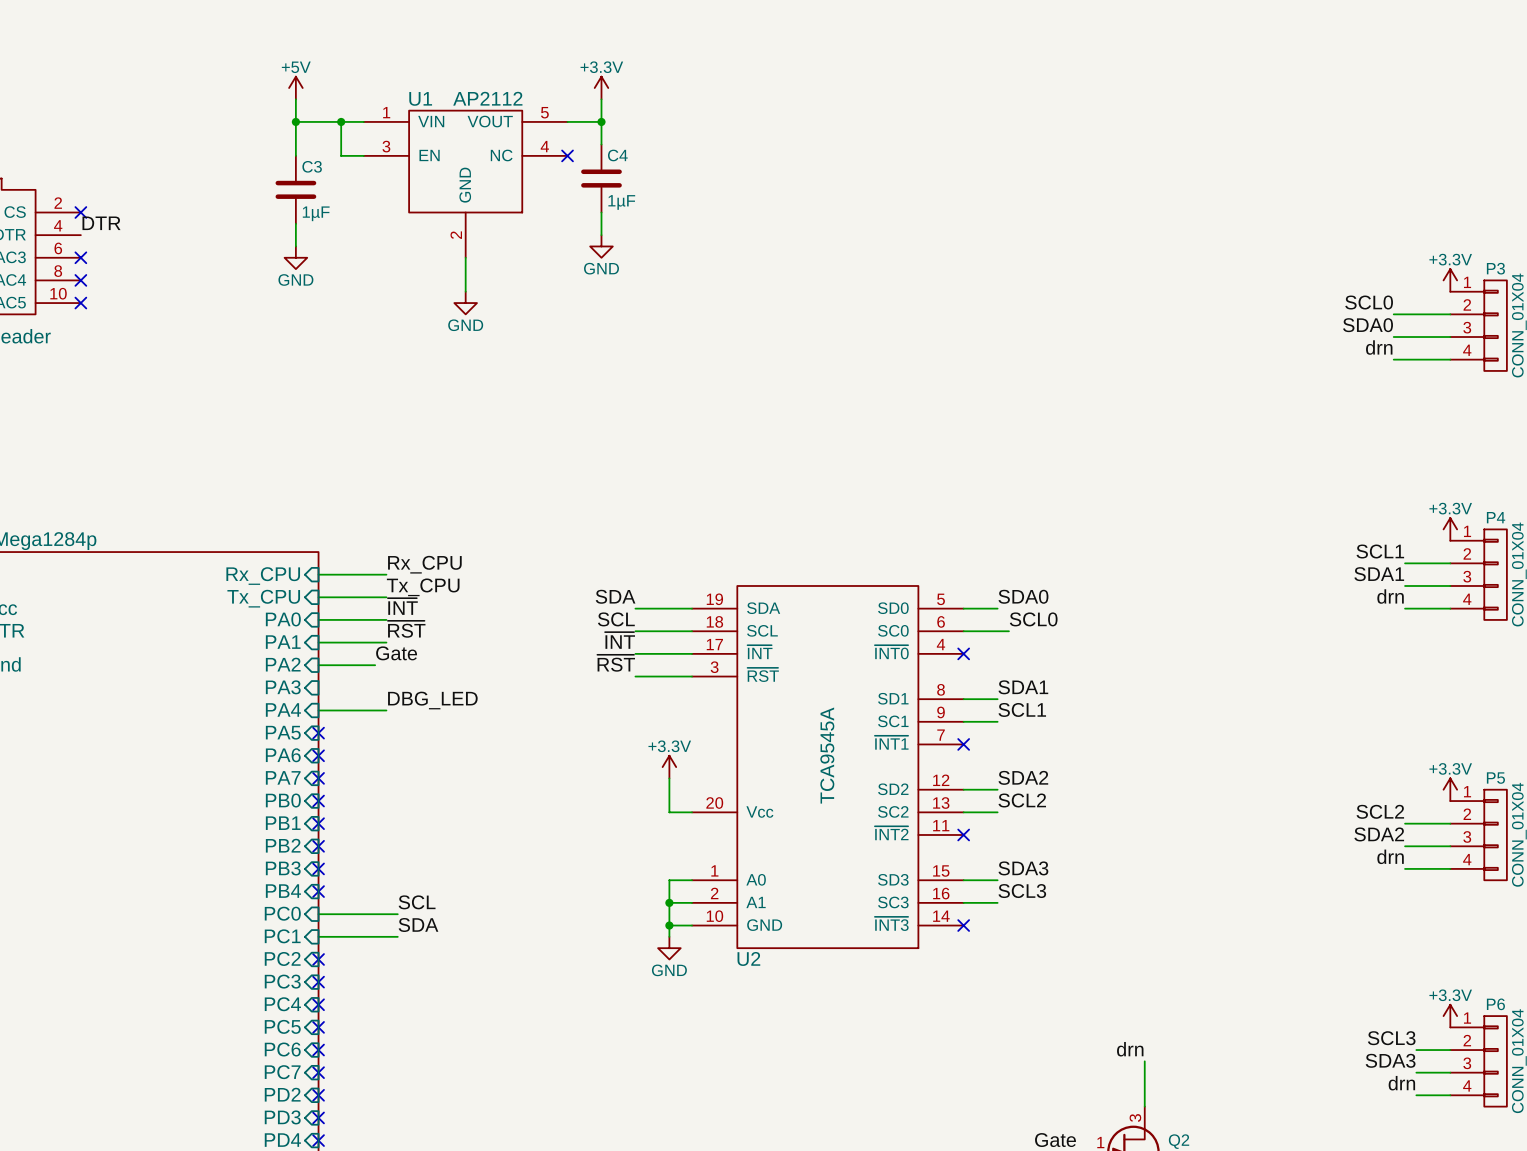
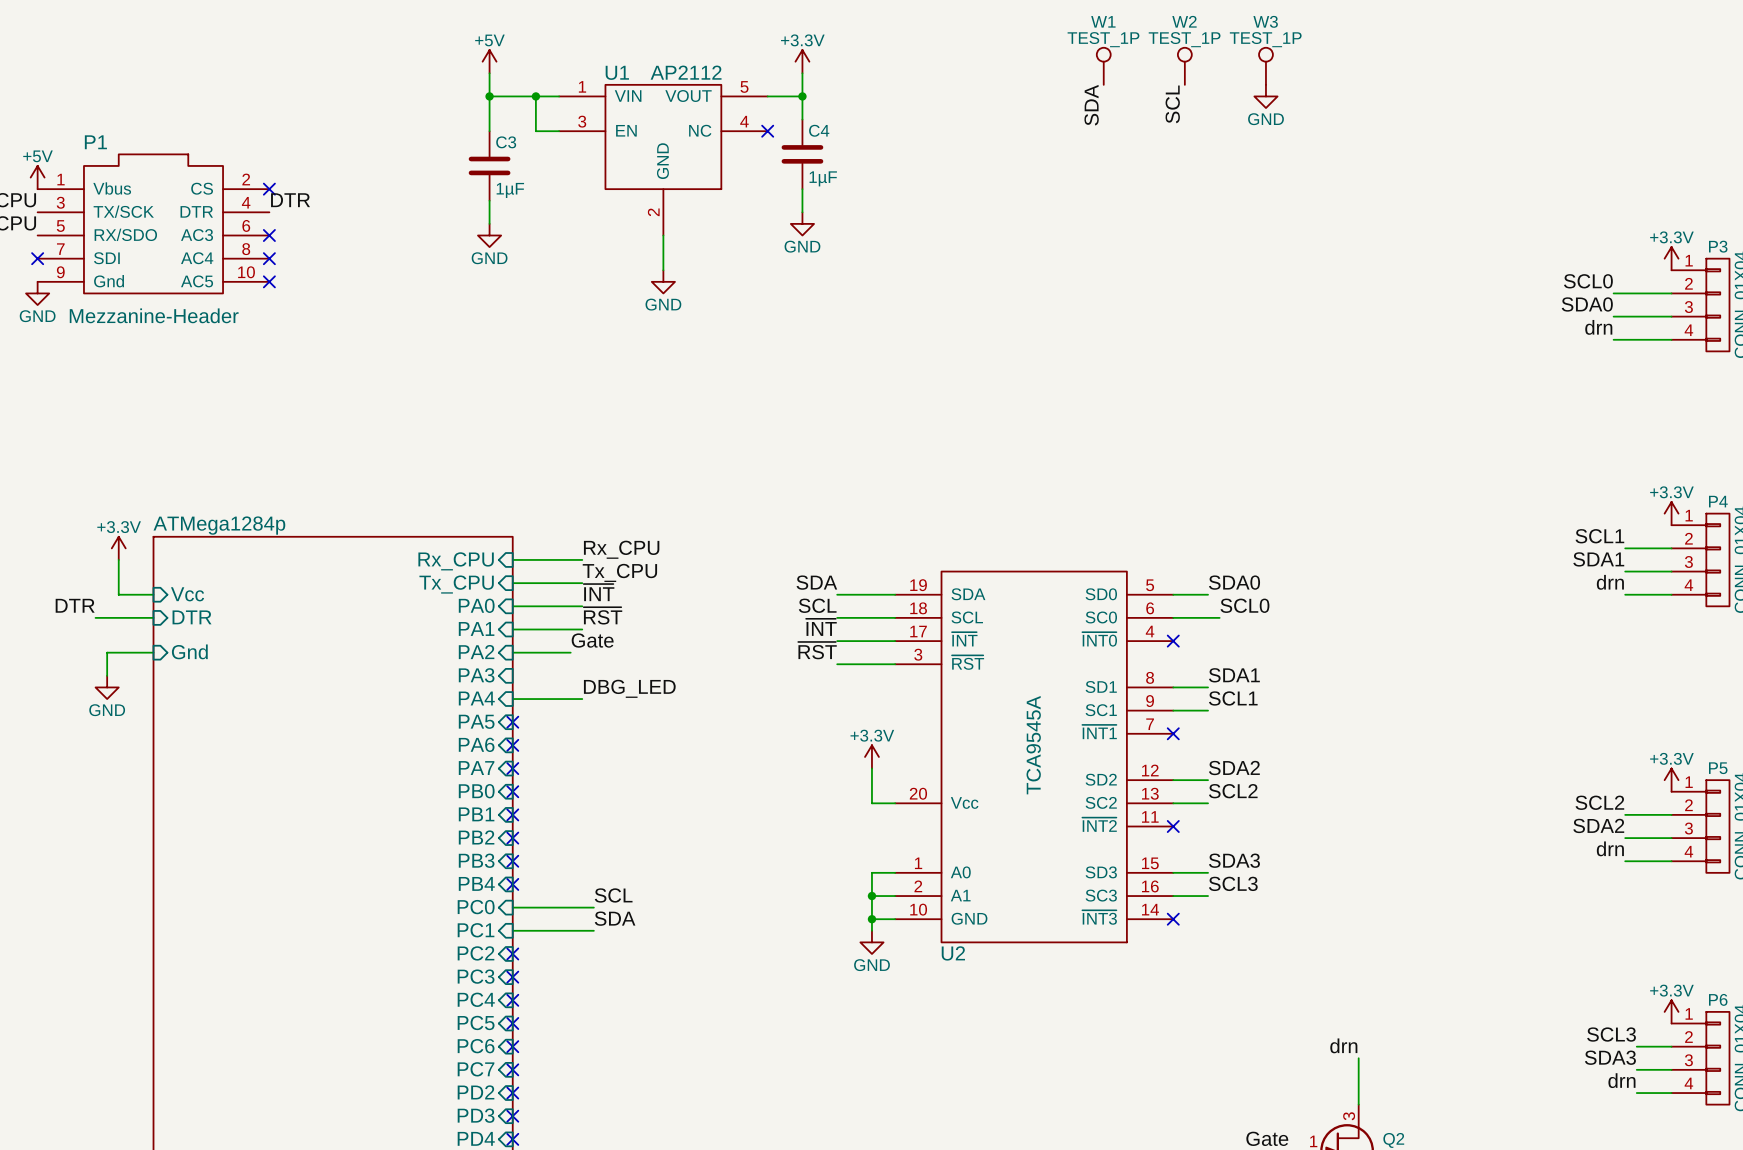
W1: none -> TEST_1P (1103, 66)
W2: none -> TEST_1P (1184, 66)
W3: none -> TEST_1P (1265, 66)
power symbol: none -> GND (1265, 96)
label: none -> SCL (1172, 104)
label: none -> SDA (1091, 105)

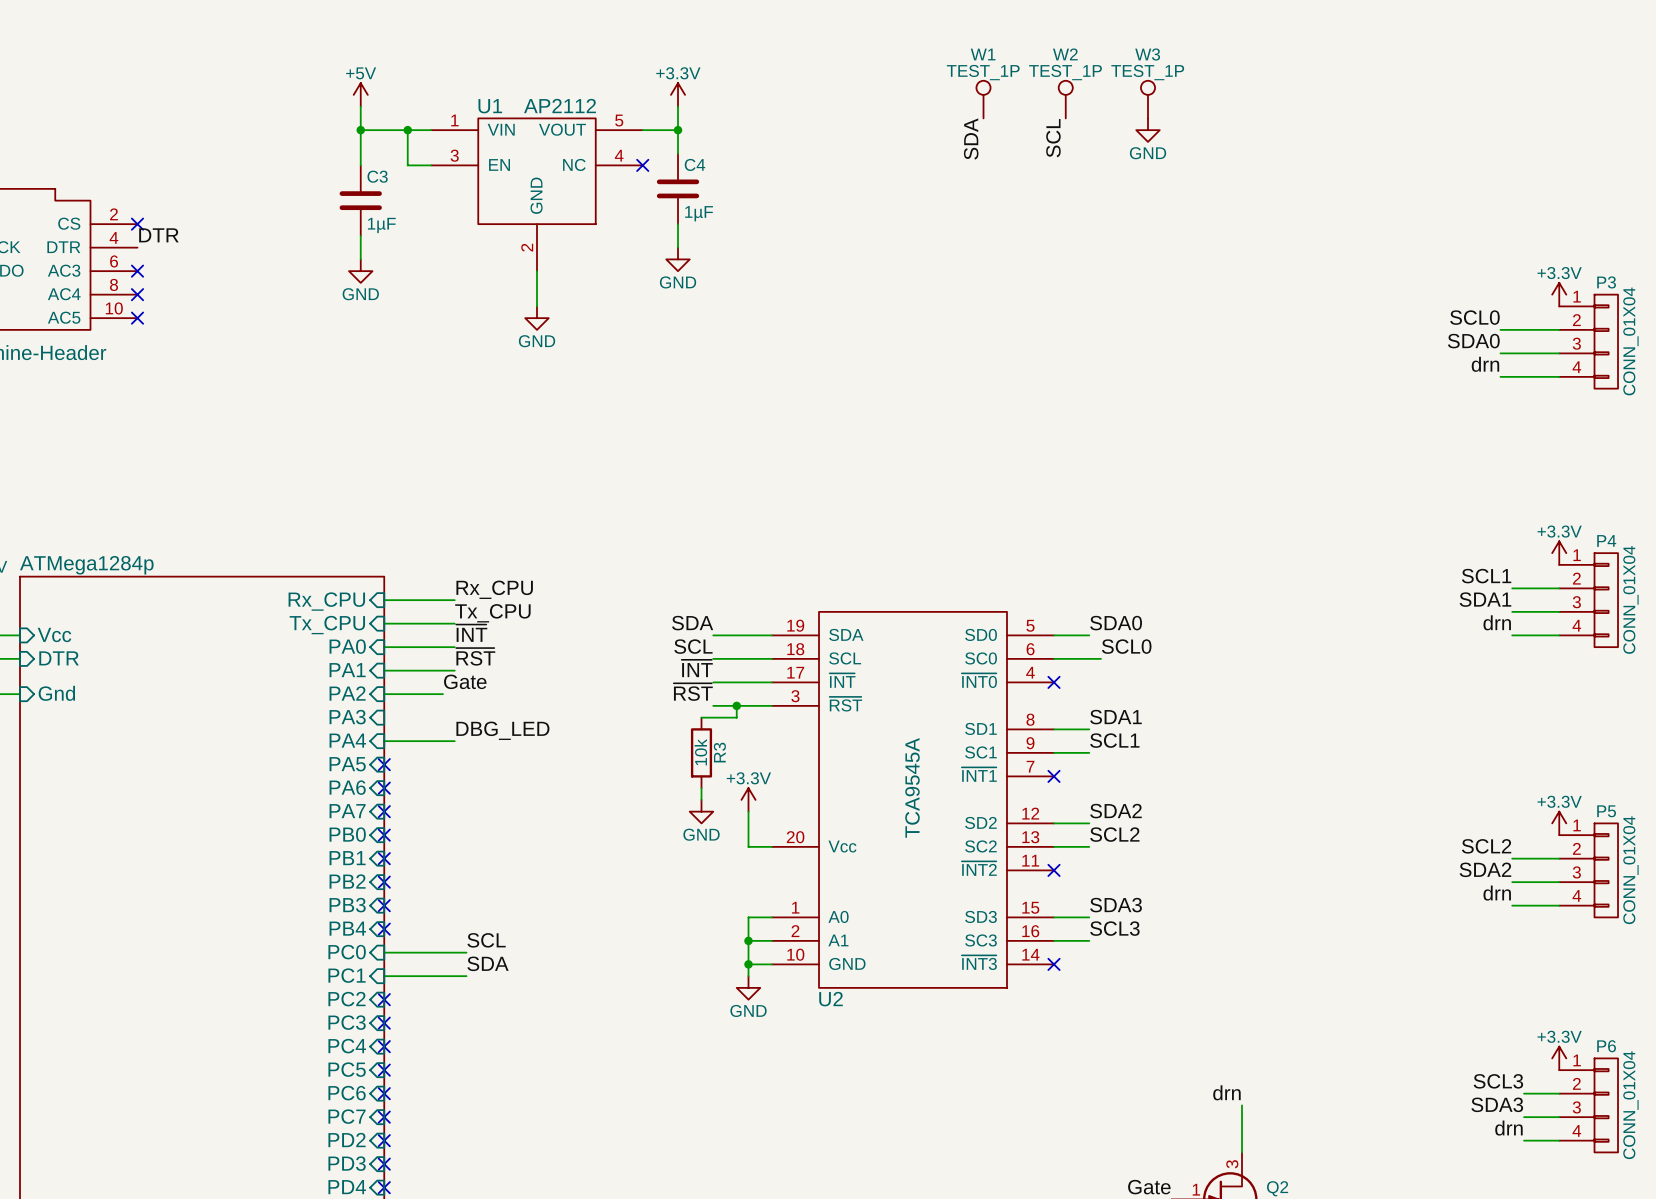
wire: none -> (736, 705) (736, 717) (701, 717)
junction: none -> (736, 705)
R3: none -> 10k (701, 752)
wire: none -> (701, 788) (701, 799)
power symbol: none -> GND (701, 811)

